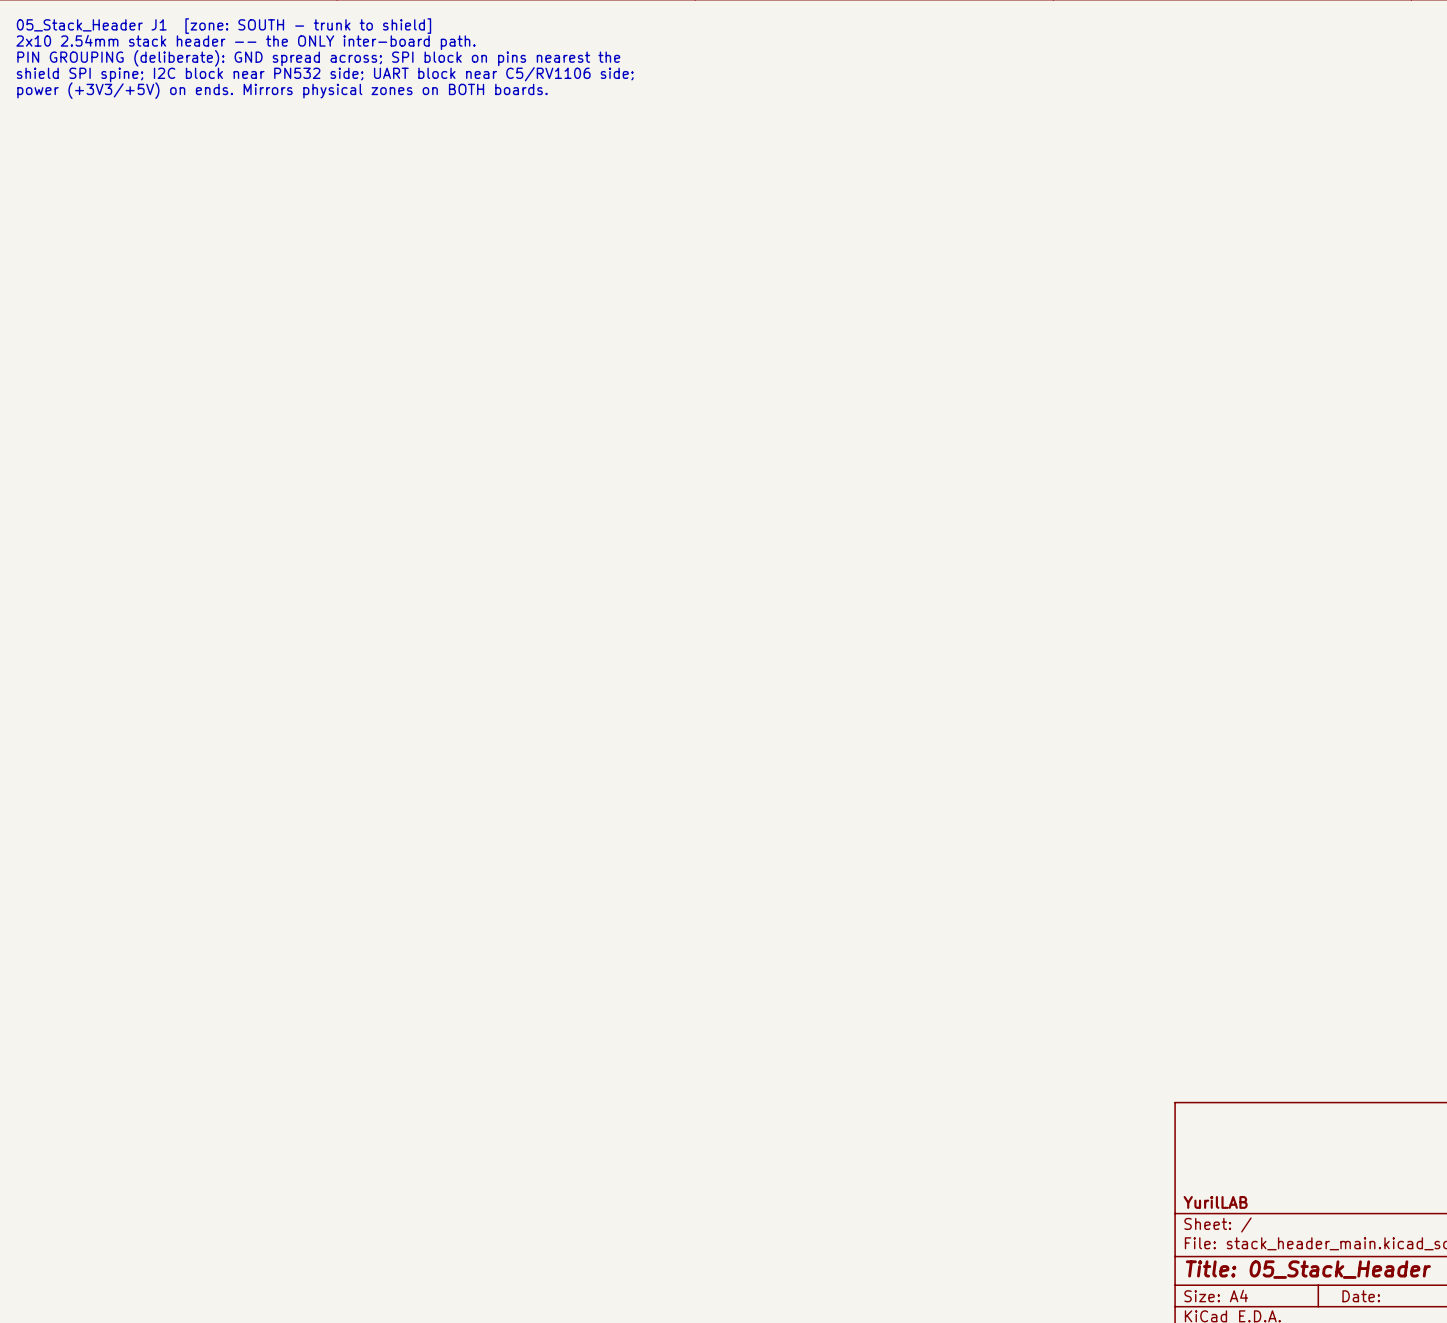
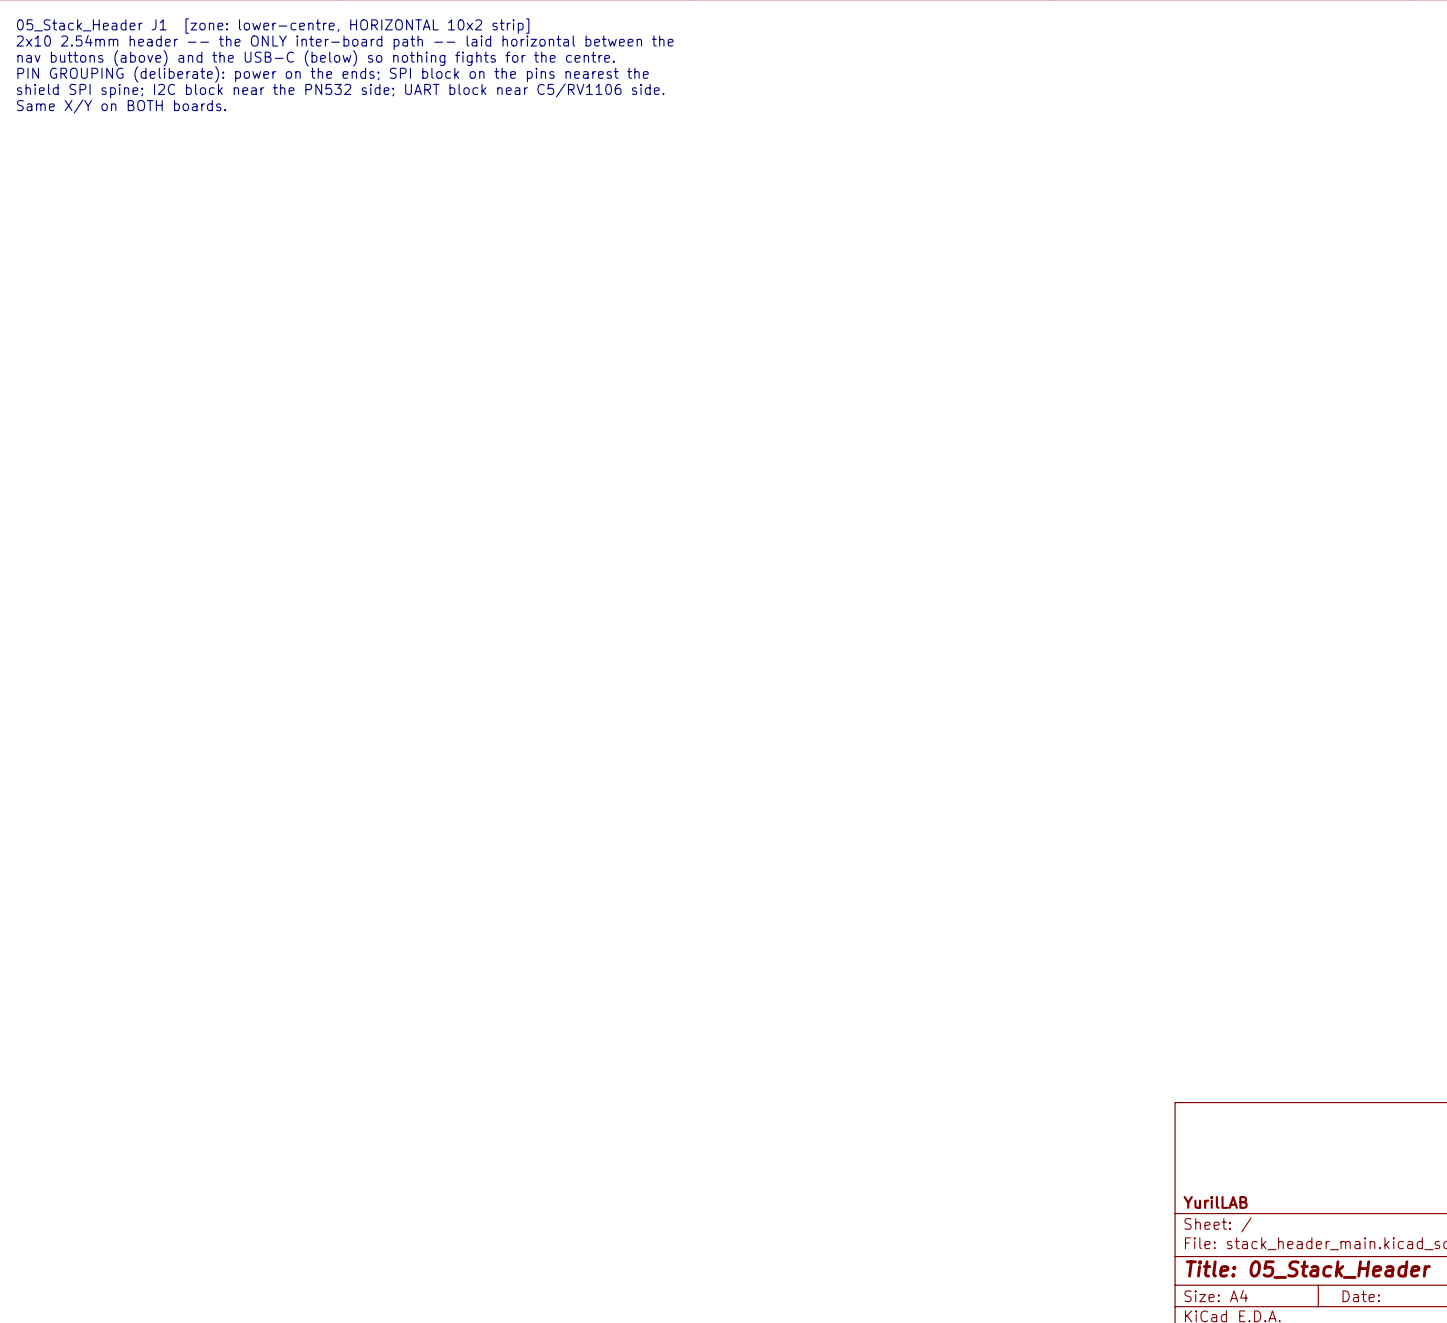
text: 05_Stack_Header J1 [zone: SOUTH - trunk to shield] (223, 26) -> 05_Stack_Header J1 [zone: lower-centre, HORIZONTAL 10x2 strip] (273, 26)
text: 2x10 2.54mm stack header -- the ONLY inter-board path. (245, 42) -> 2x10 2.54mm header -- the ONLY inter-board path -- laid horizontal between the (345, 42)
text: PIN GROUPING (deliberate): GND spread across; SPI block on pins nearest the (318, 58) -> nav buttons (above) and the USB-C (below) so nothing fights for the centre. (316, 58)
text: shield SPI spine; I2C block near PN532 side; UART block near C5/RV1106 side; (325, 74) -> PIN GROUPING (deliberate): power on the ends; SPI block on the pins nearest the (333, 74)
text: power (+3V3/+5V) on ends. Mirrors physical zones on BOTH boards. (282, 90) -> shield SPI spine; I2C block near the PN532 side; UART block near C5/RV1106 side. (340, 90)
text: none -> Same X/Y on BOTH boards. (121, 106)

